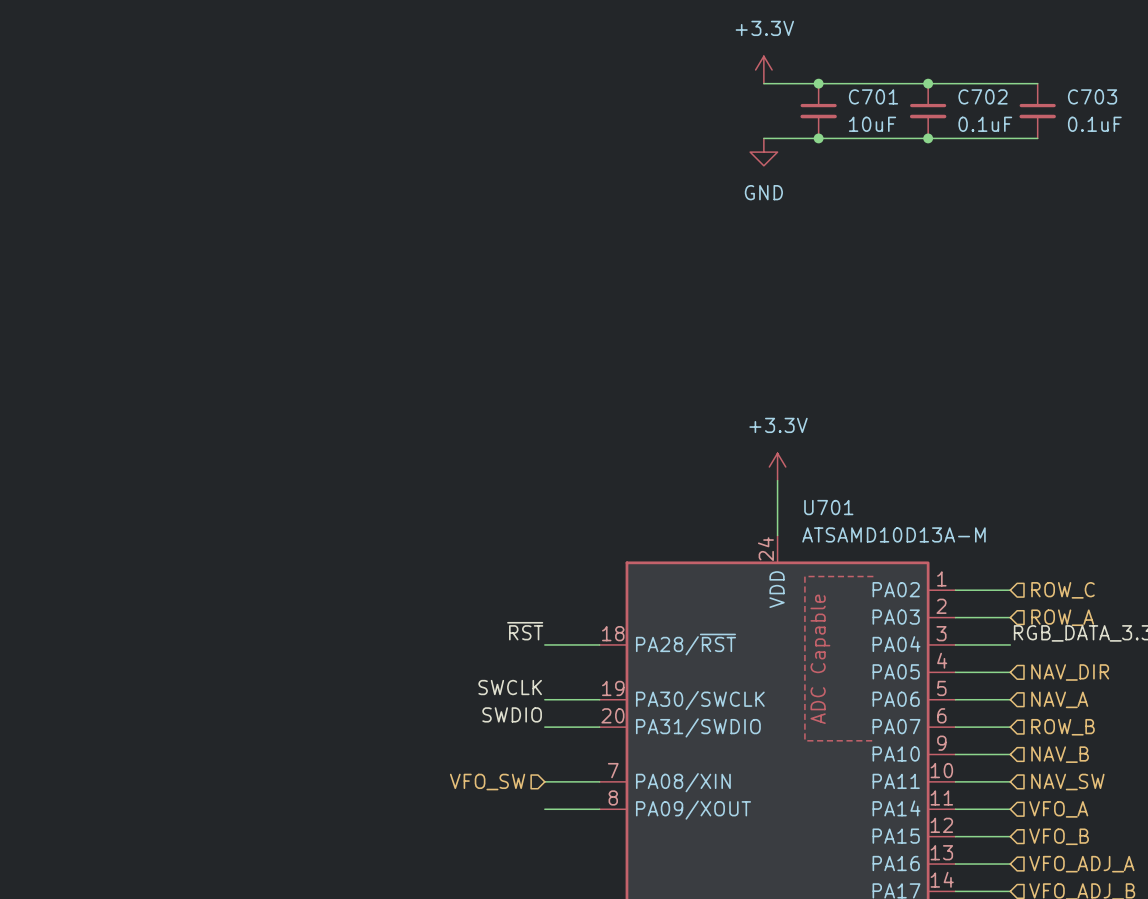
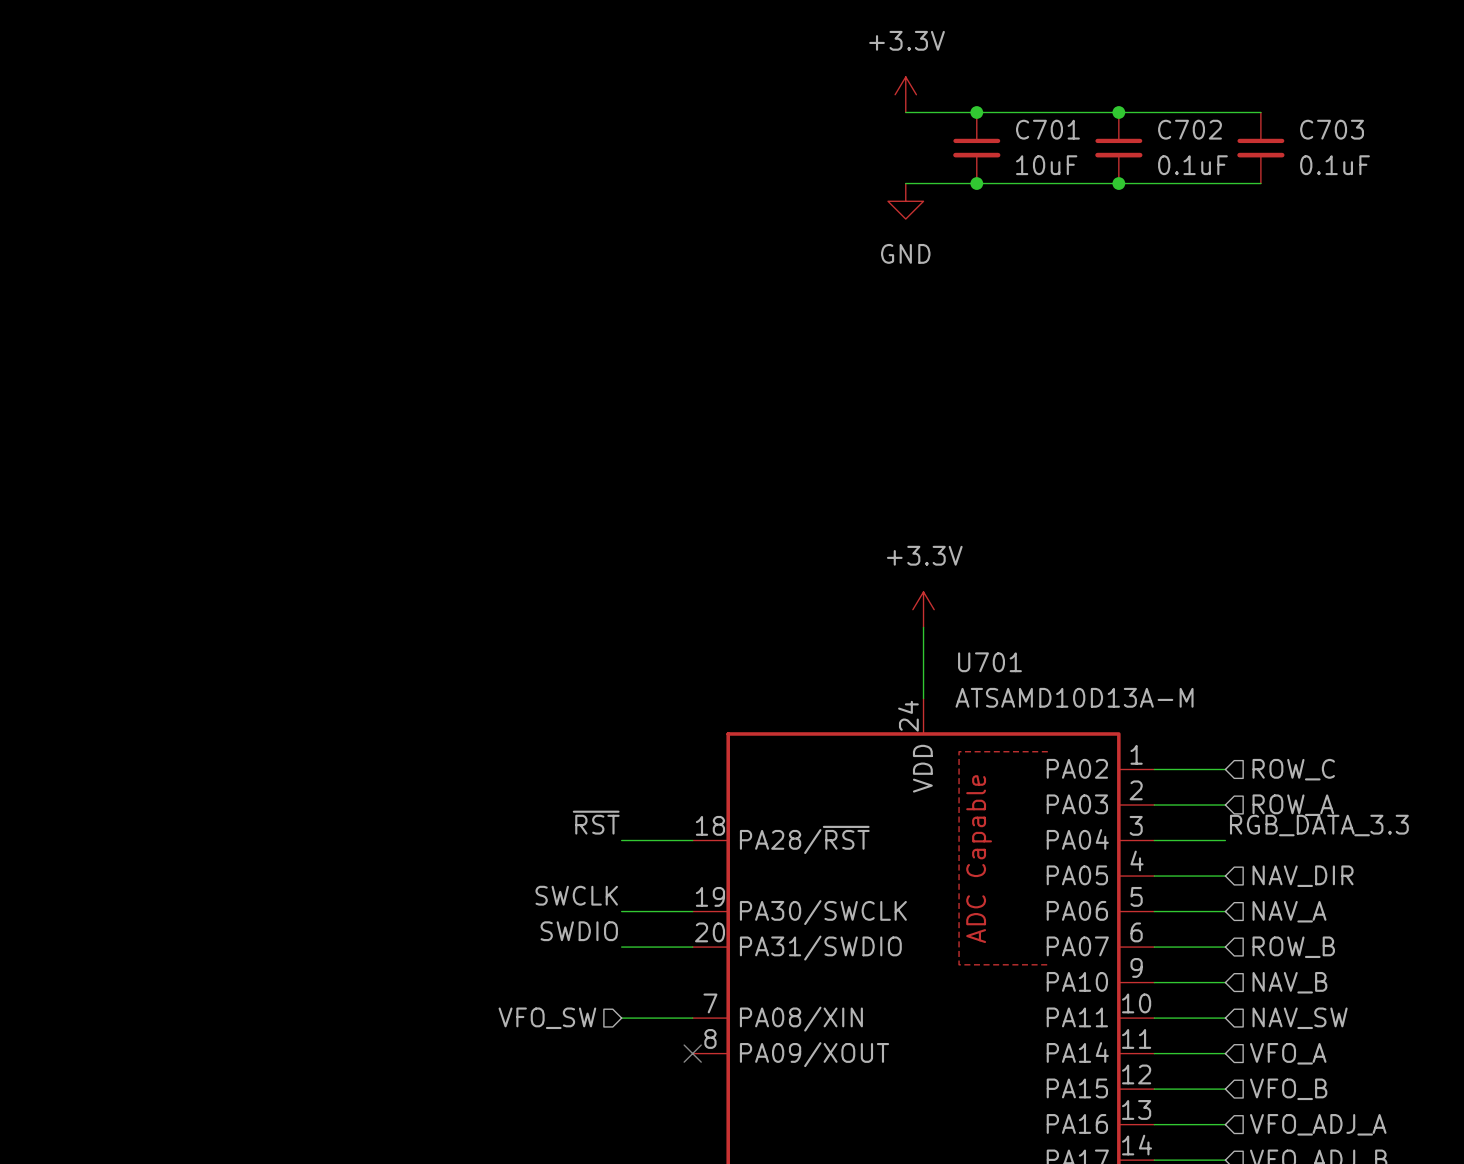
wire: (544, 809) (599, 809) -> none
no-connect mark: none -> (692, 1053)

